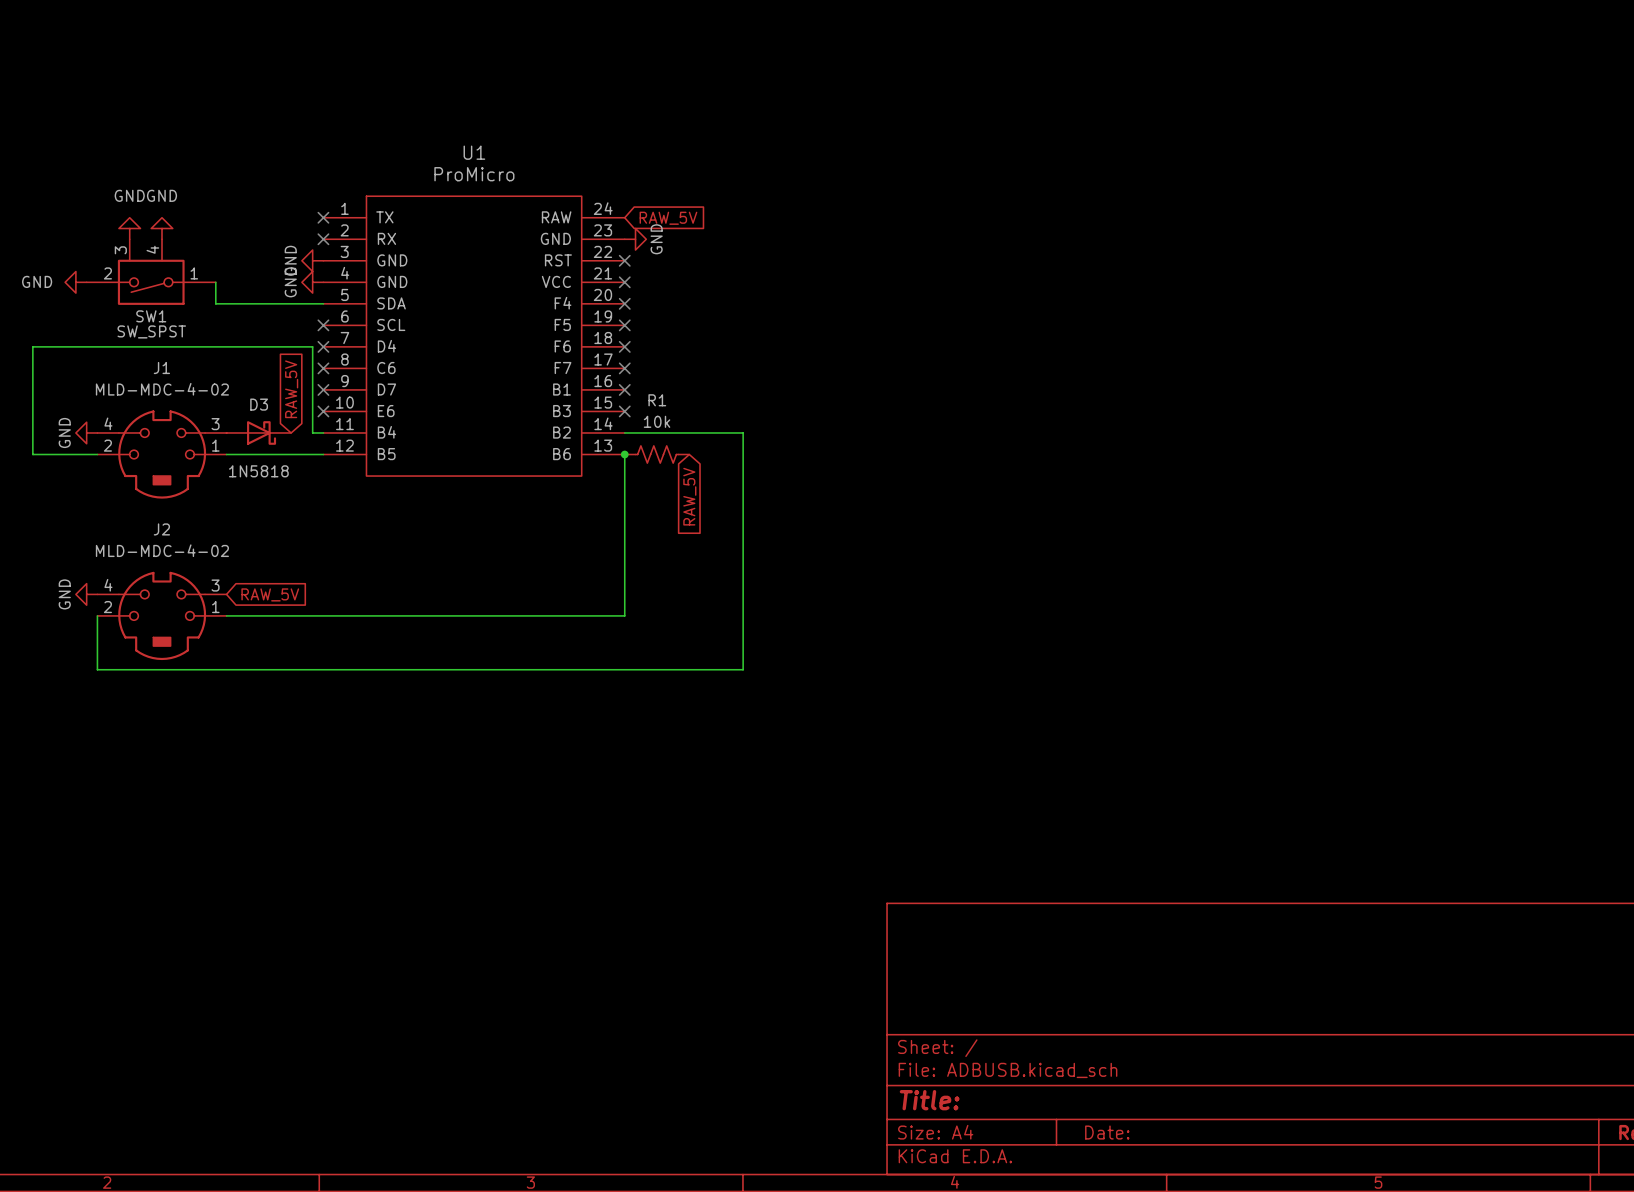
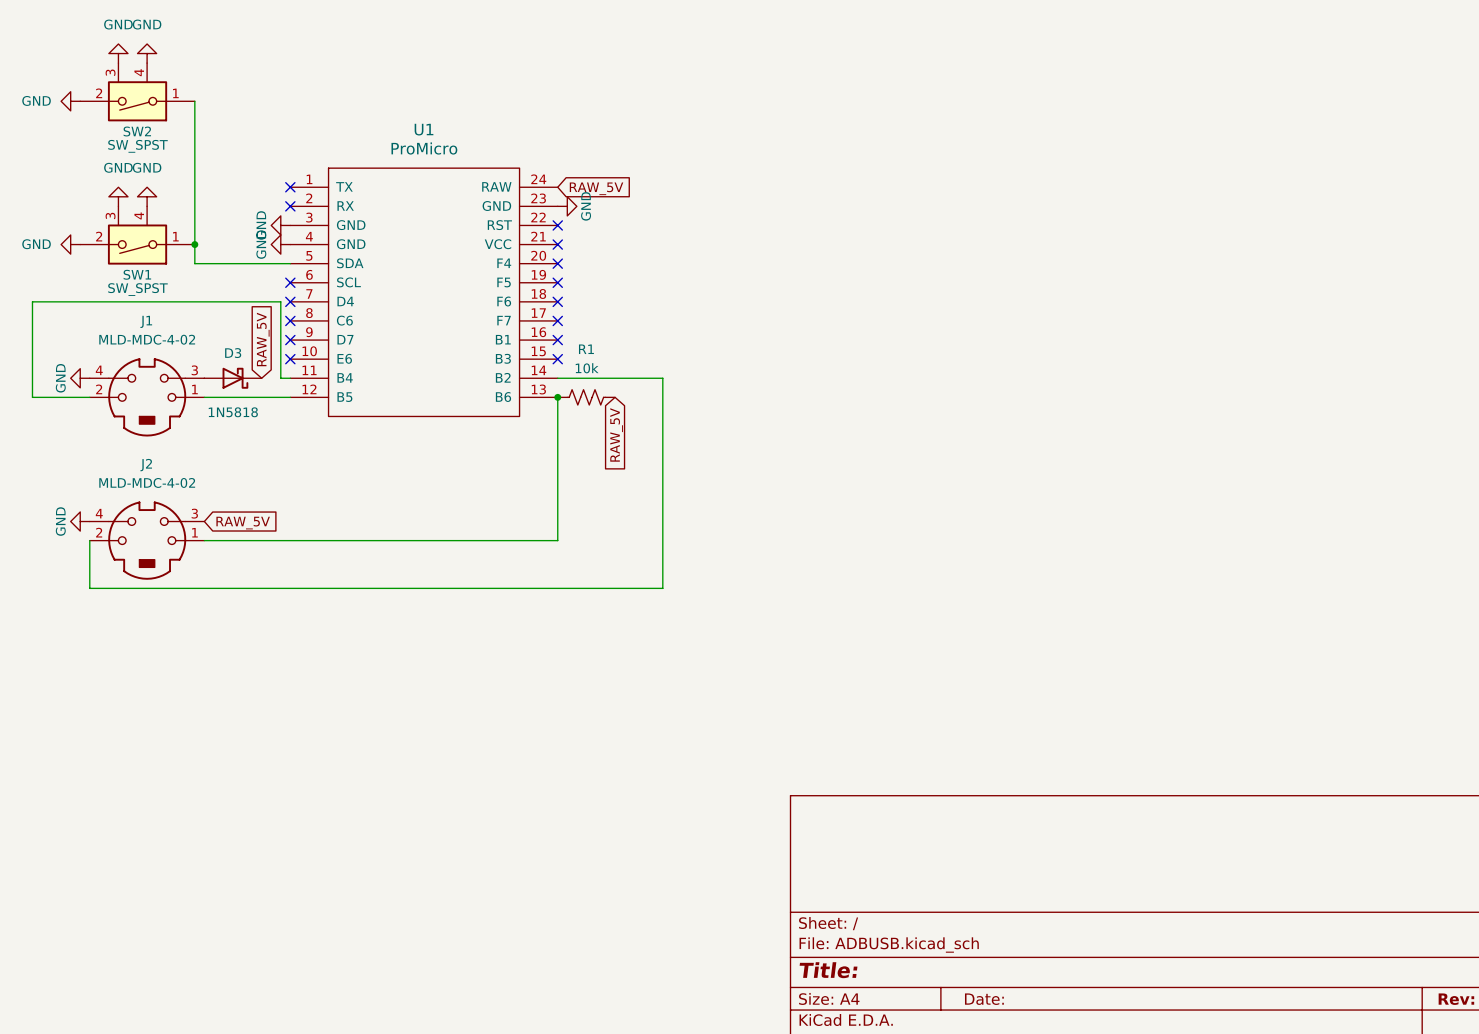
power symbol: none -> GND (118, 53)
power symbol: none -> GND (147, 53)
SW2: none -> SW_SPST (137, 92)
power symbol: none -> GND (70, 101)
wire: none -> (194, 101) (194, 244)
junction: none -> (194, 244)

